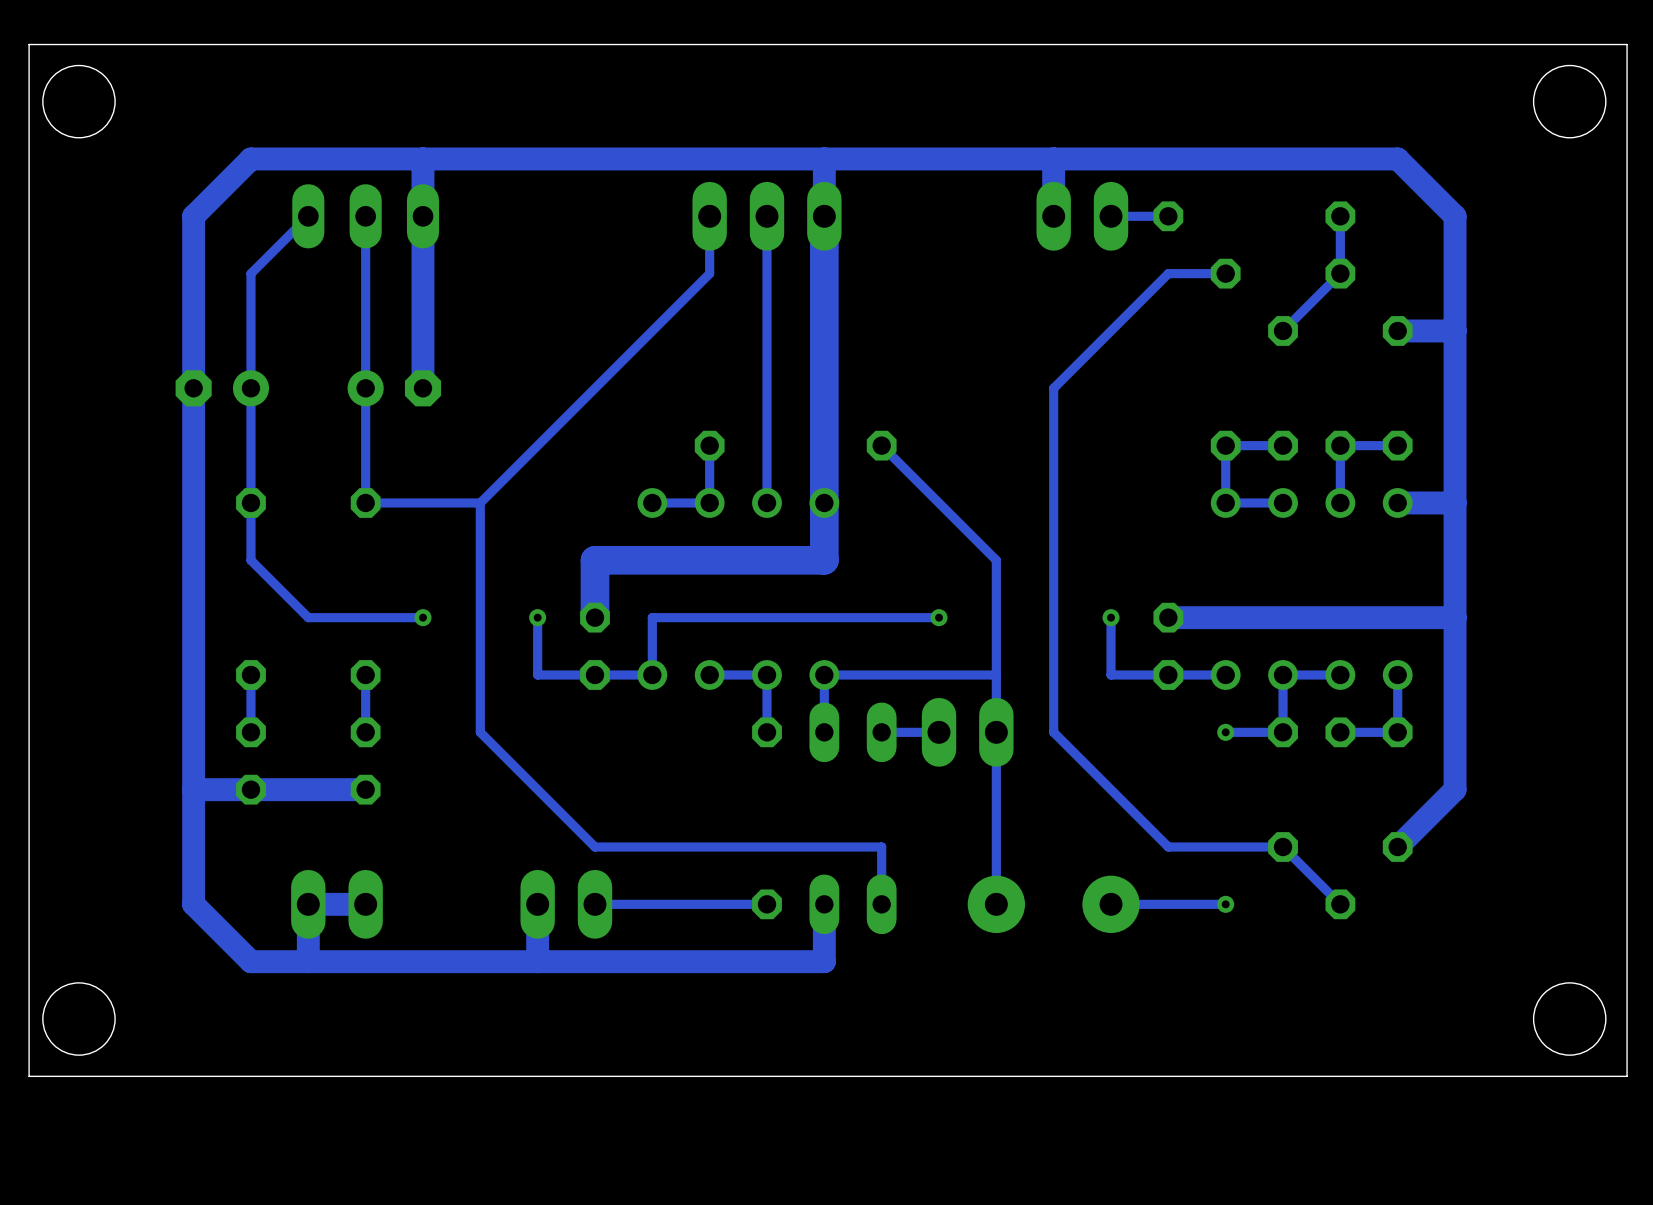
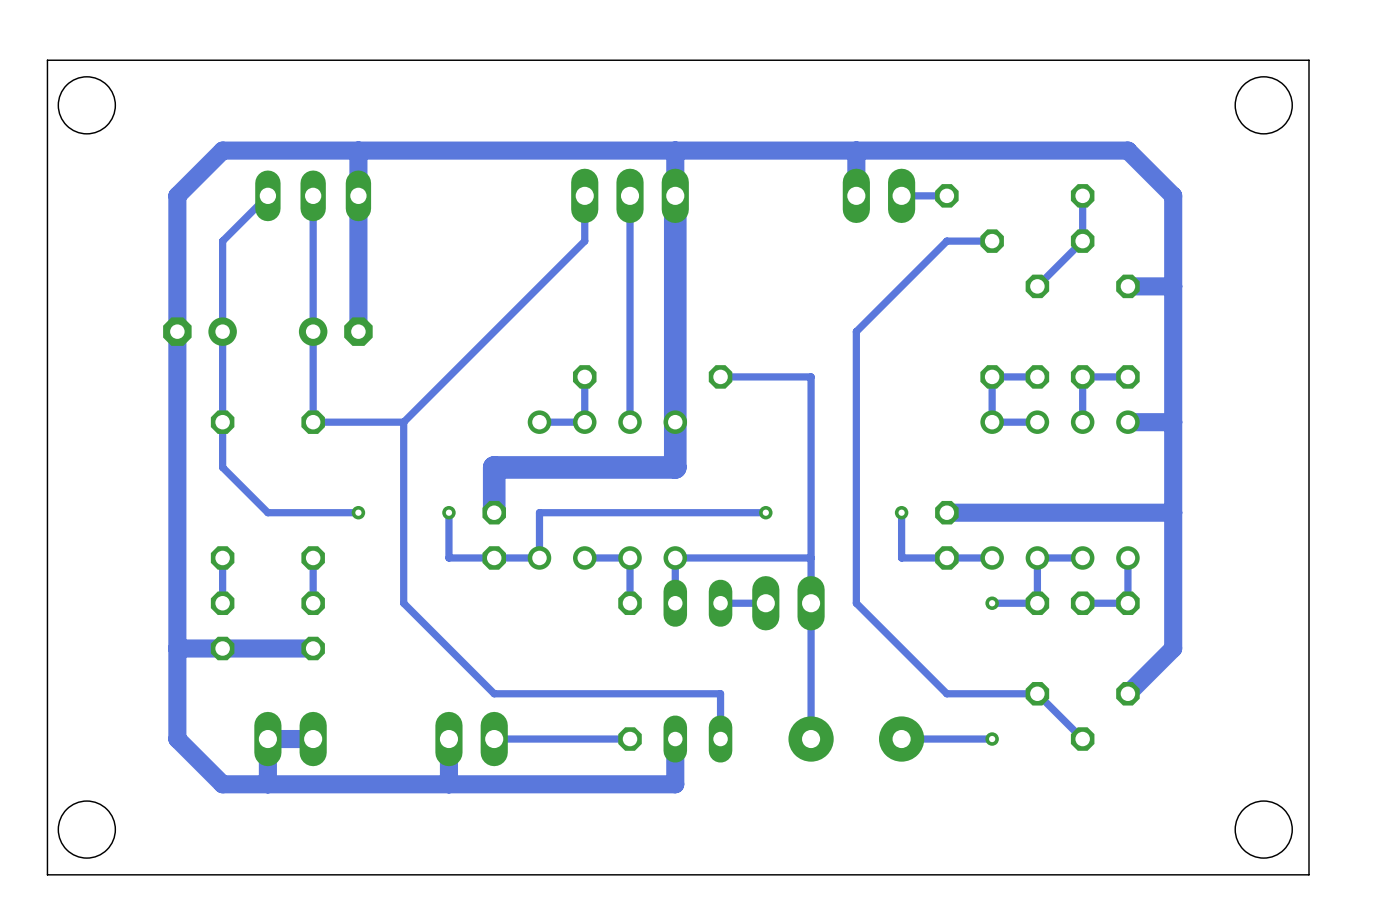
track: (881, 445) (996, 560) -> (720, 376) (811, 376) (811, 467)

